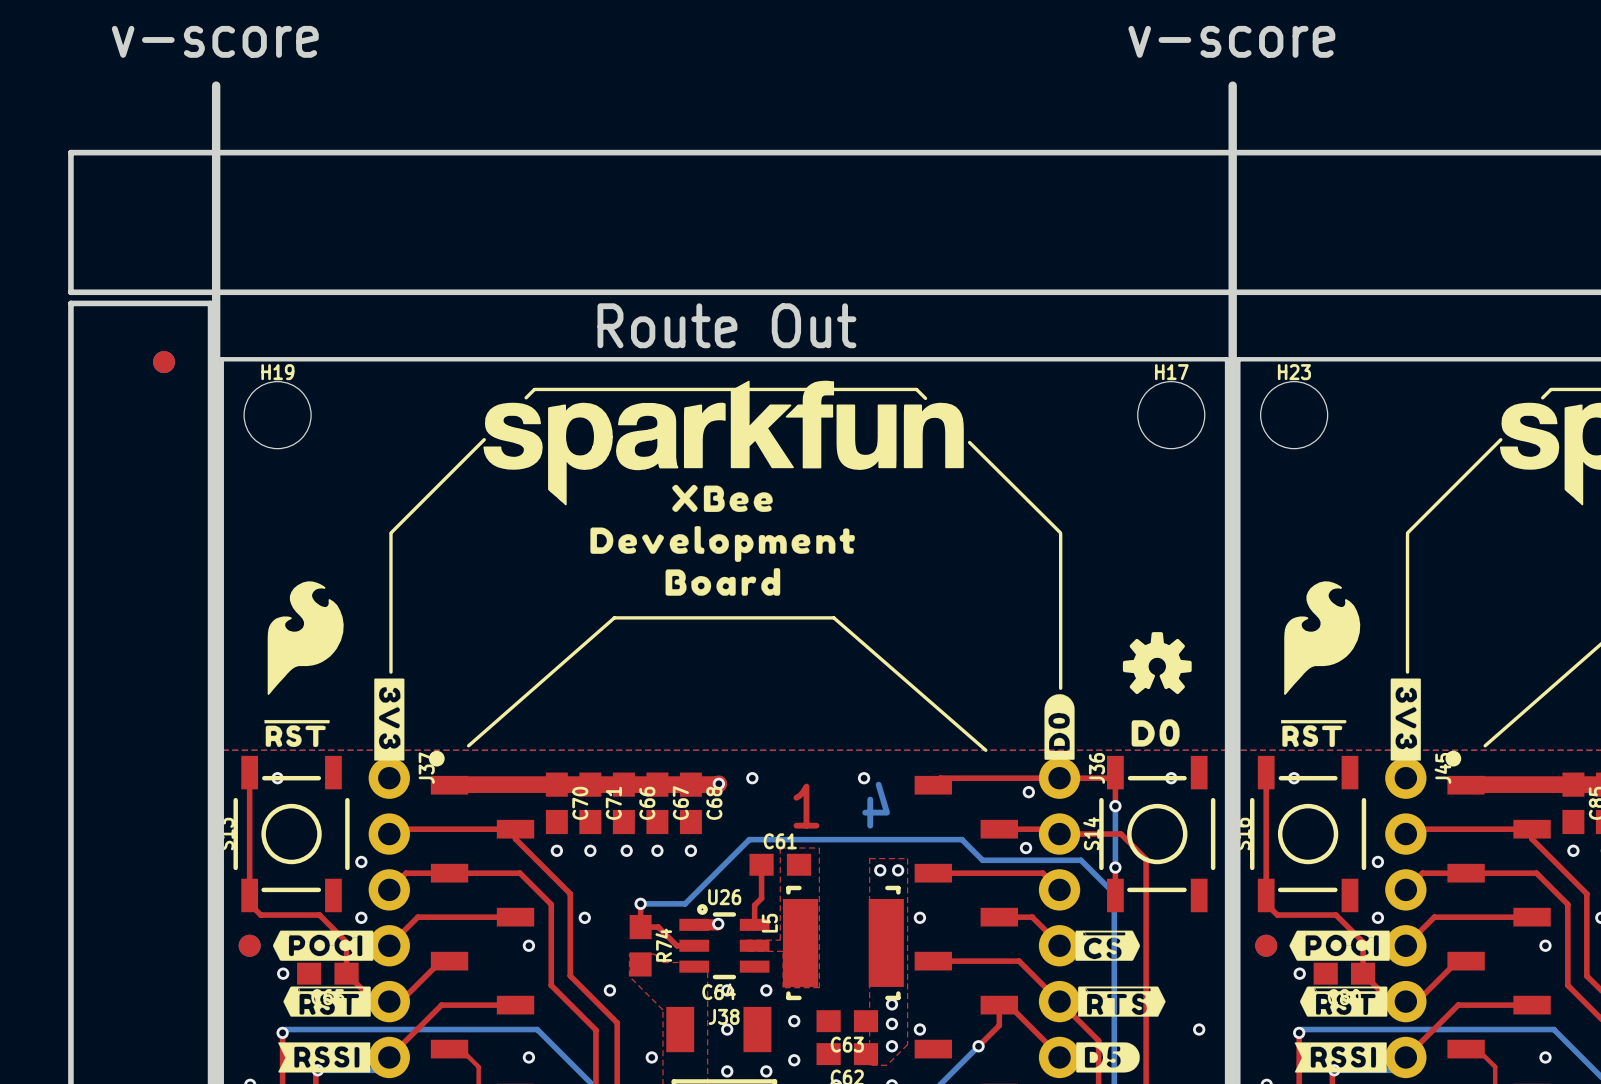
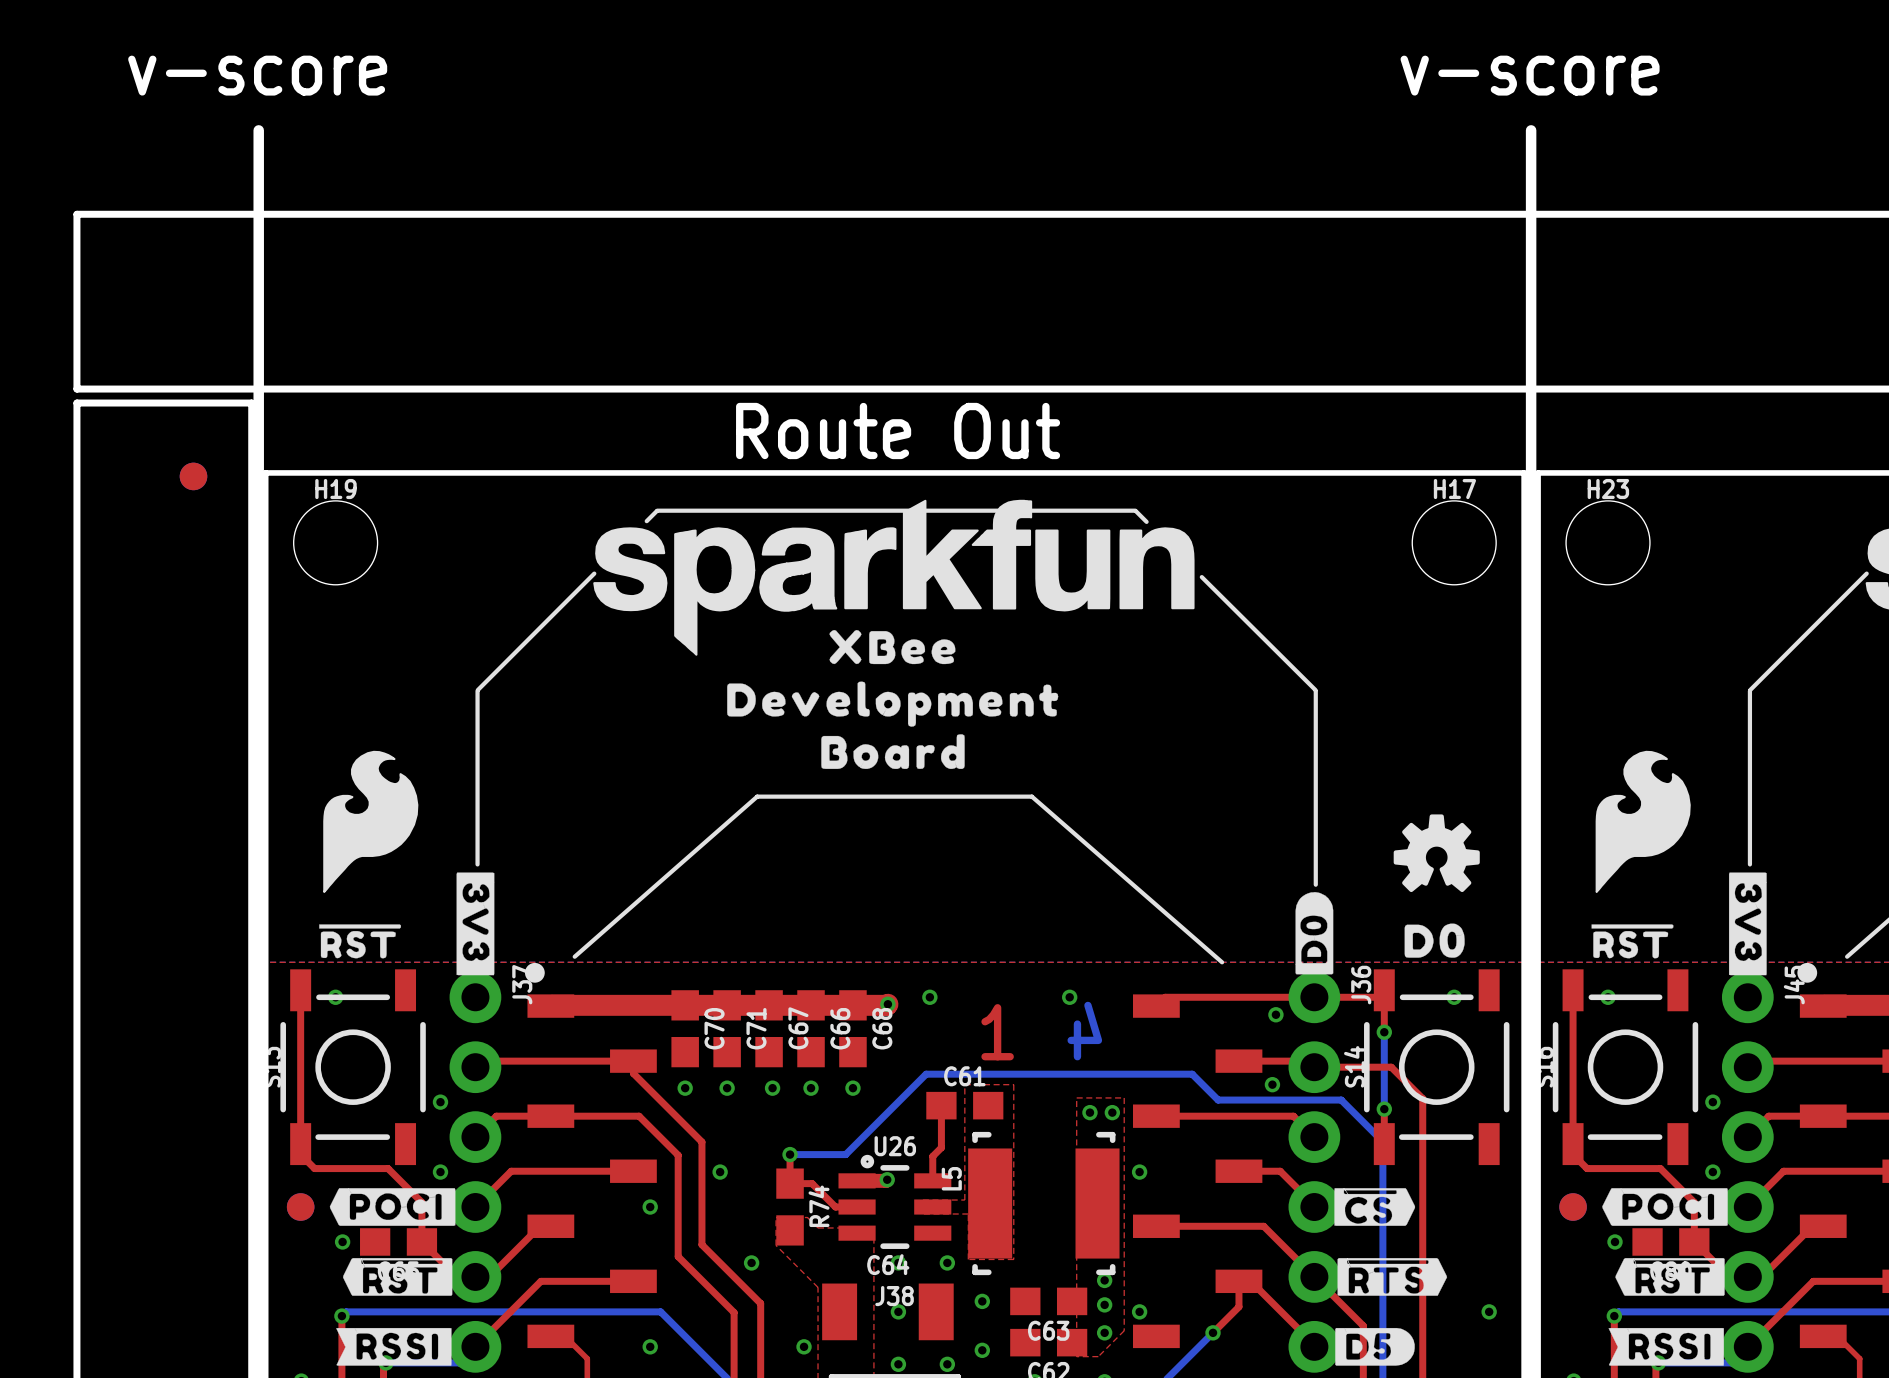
C66 name: C66 (647, 803) -> C67 (798, 1028)
C67 name: C67 (680, 803) -> C66 (840, 1028)

